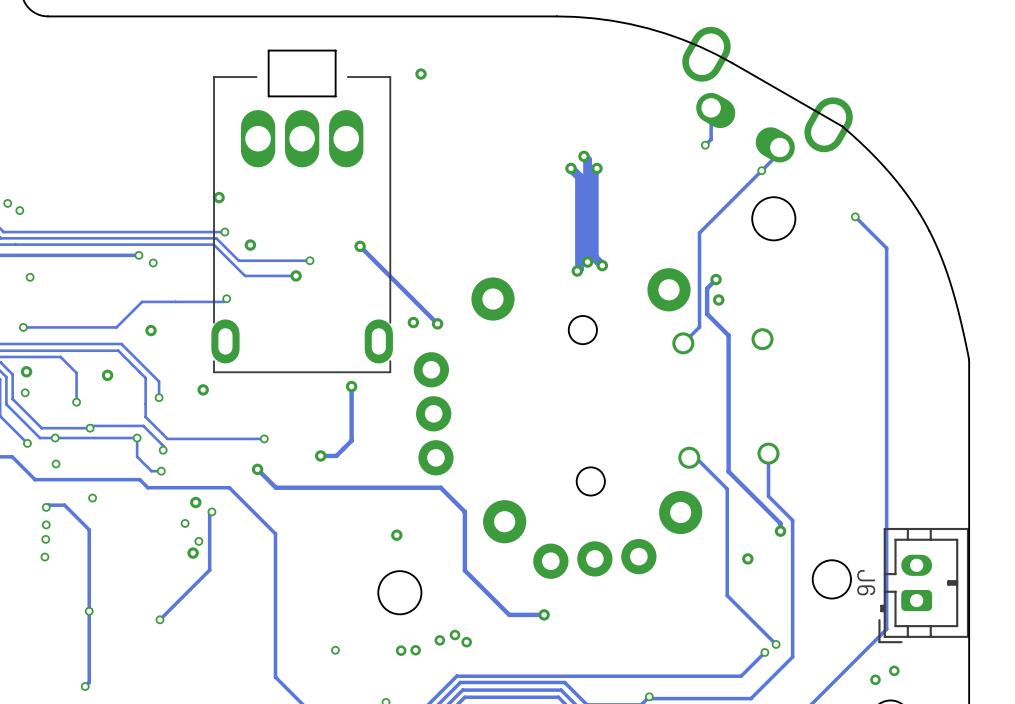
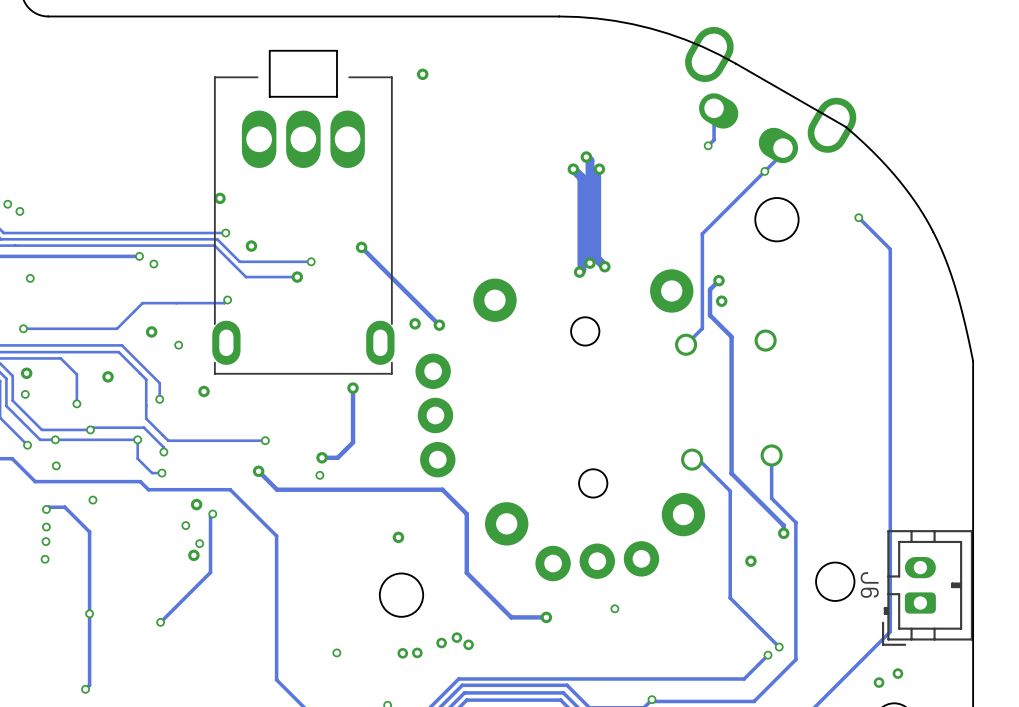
via: none -> (178, 345)
via: none -> (319, 475)
via: none -> (614, 608)

